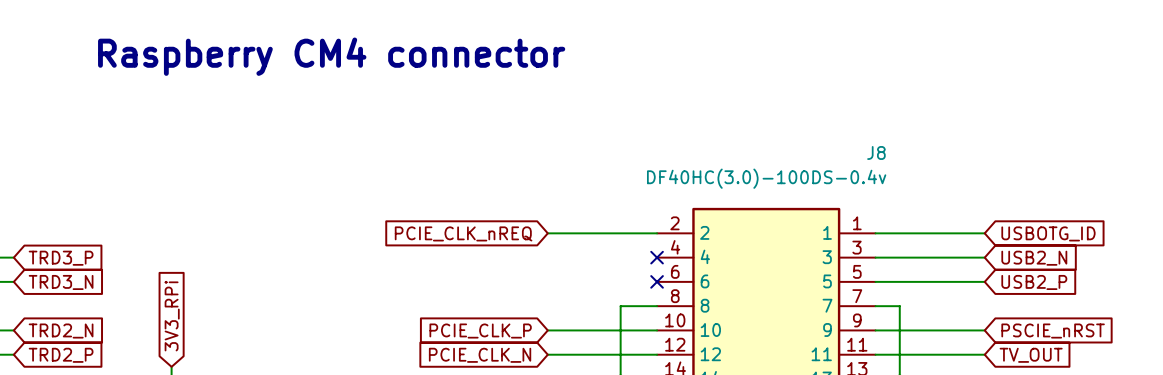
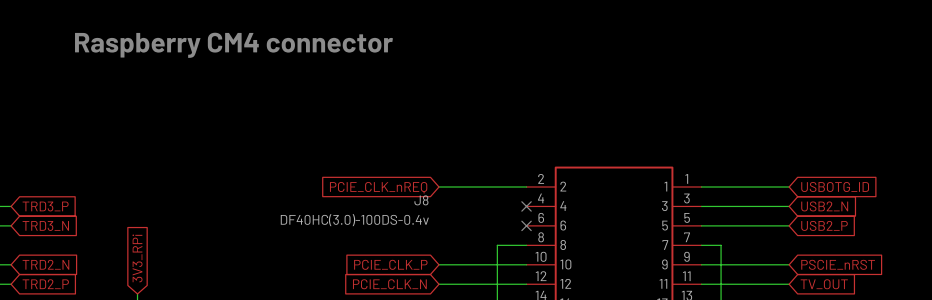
J8 name position: J8 (876, 152) -> J8 (421, 200)
J8 value position: DF40HC(3.0)-100DS-0.4v (766, 178) -> DF40HC(3.0)-100DS-0.4v (354, 220)

